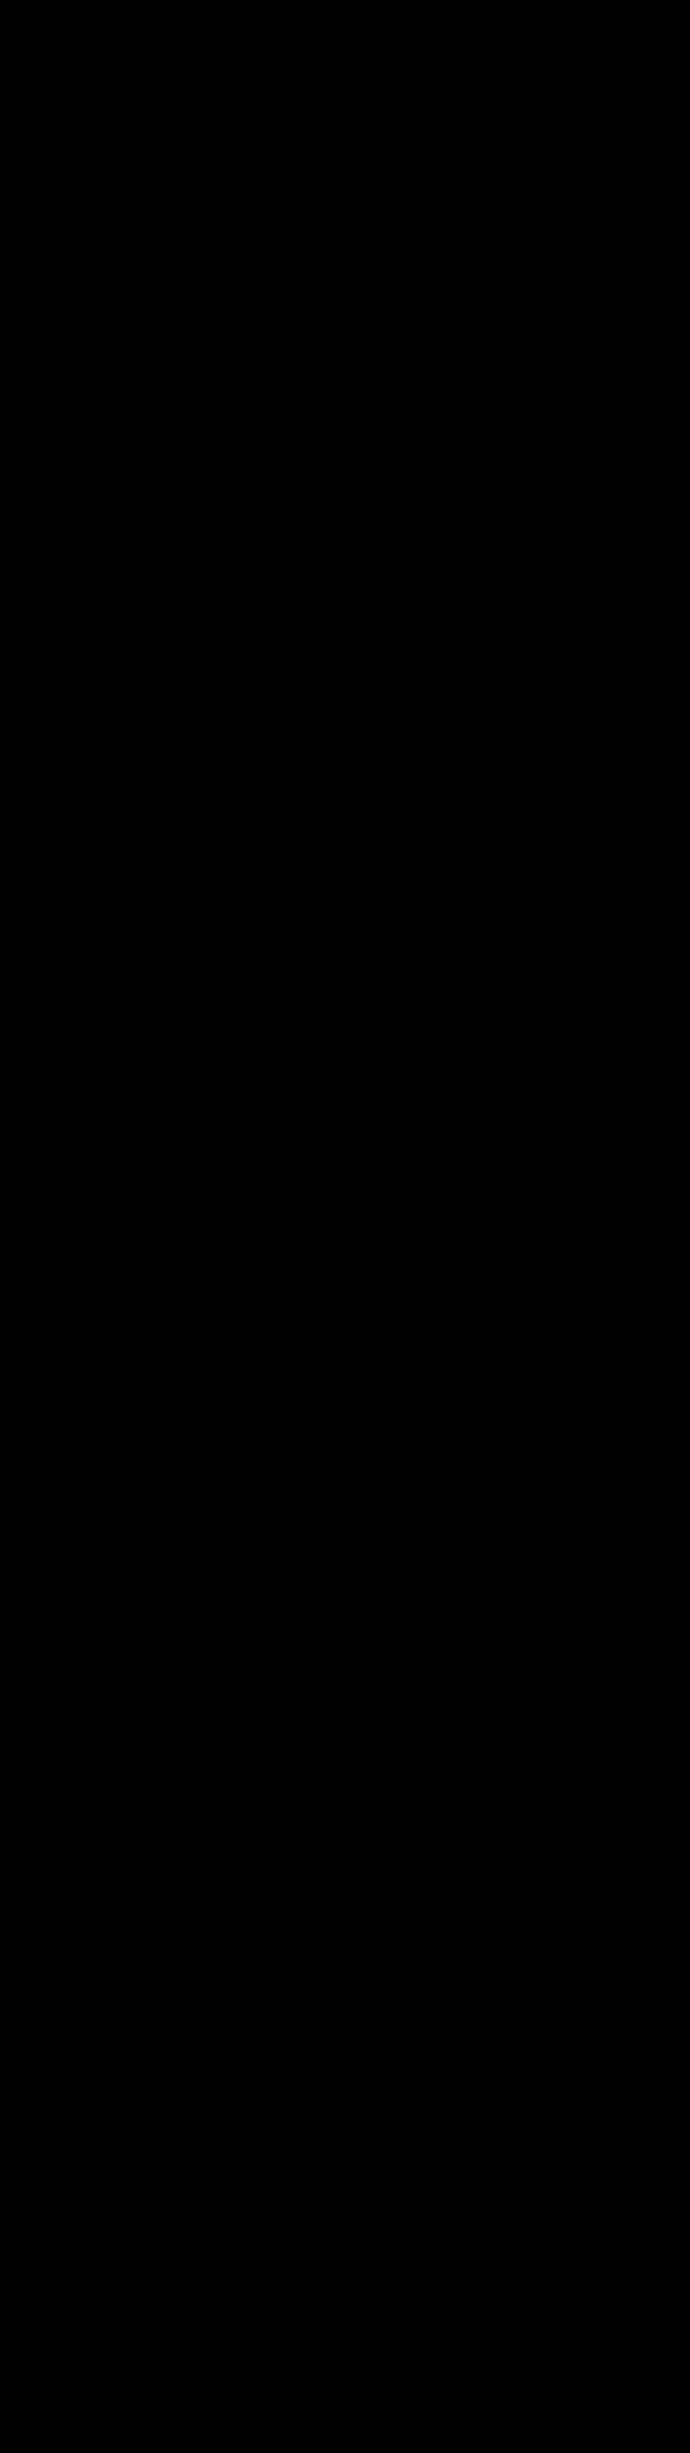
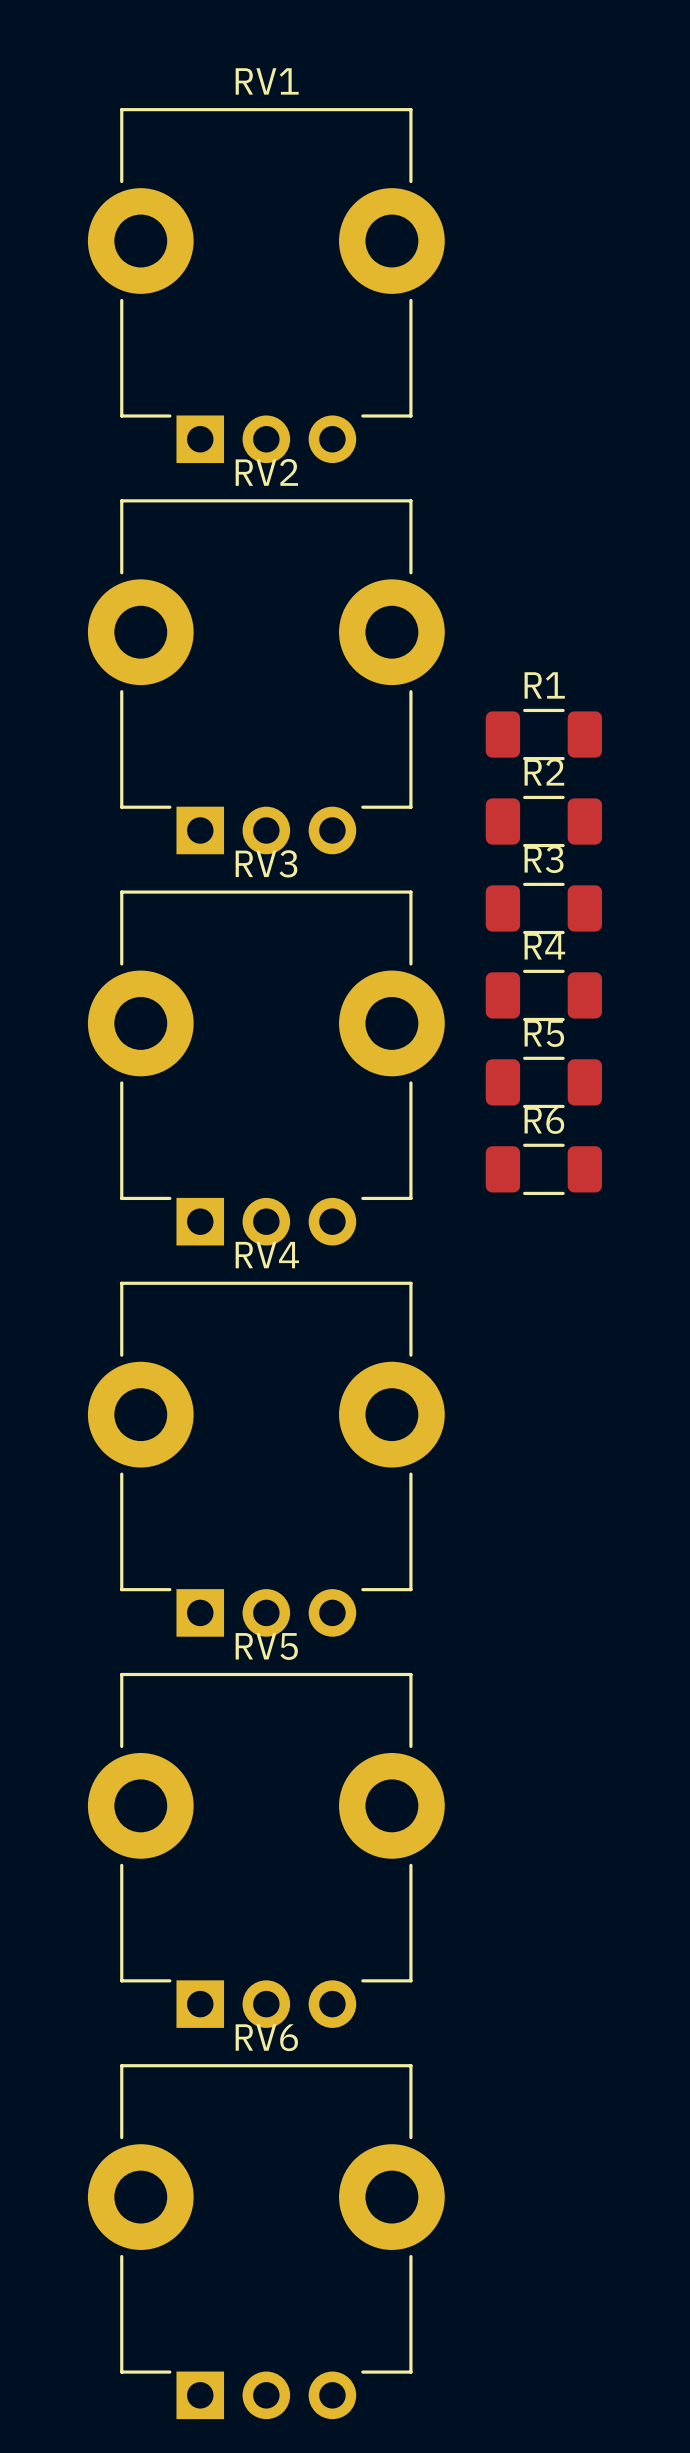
RV1: none -> (266, 285)
RV2: none -> (266, 676)
R1: none -> (543, 734)
R2: none -> (543, 821)
R3: none -> (543, 908)
R4: none -> (543, 995)
RV3: none -> (266, 1067)
R5: none -> (543, 1082)
R6: none -> (543, 1169)
RV4: none -> (266, 1459)
RV5: none -> (266, 1850)
RV6: none -> (266, 2241)

